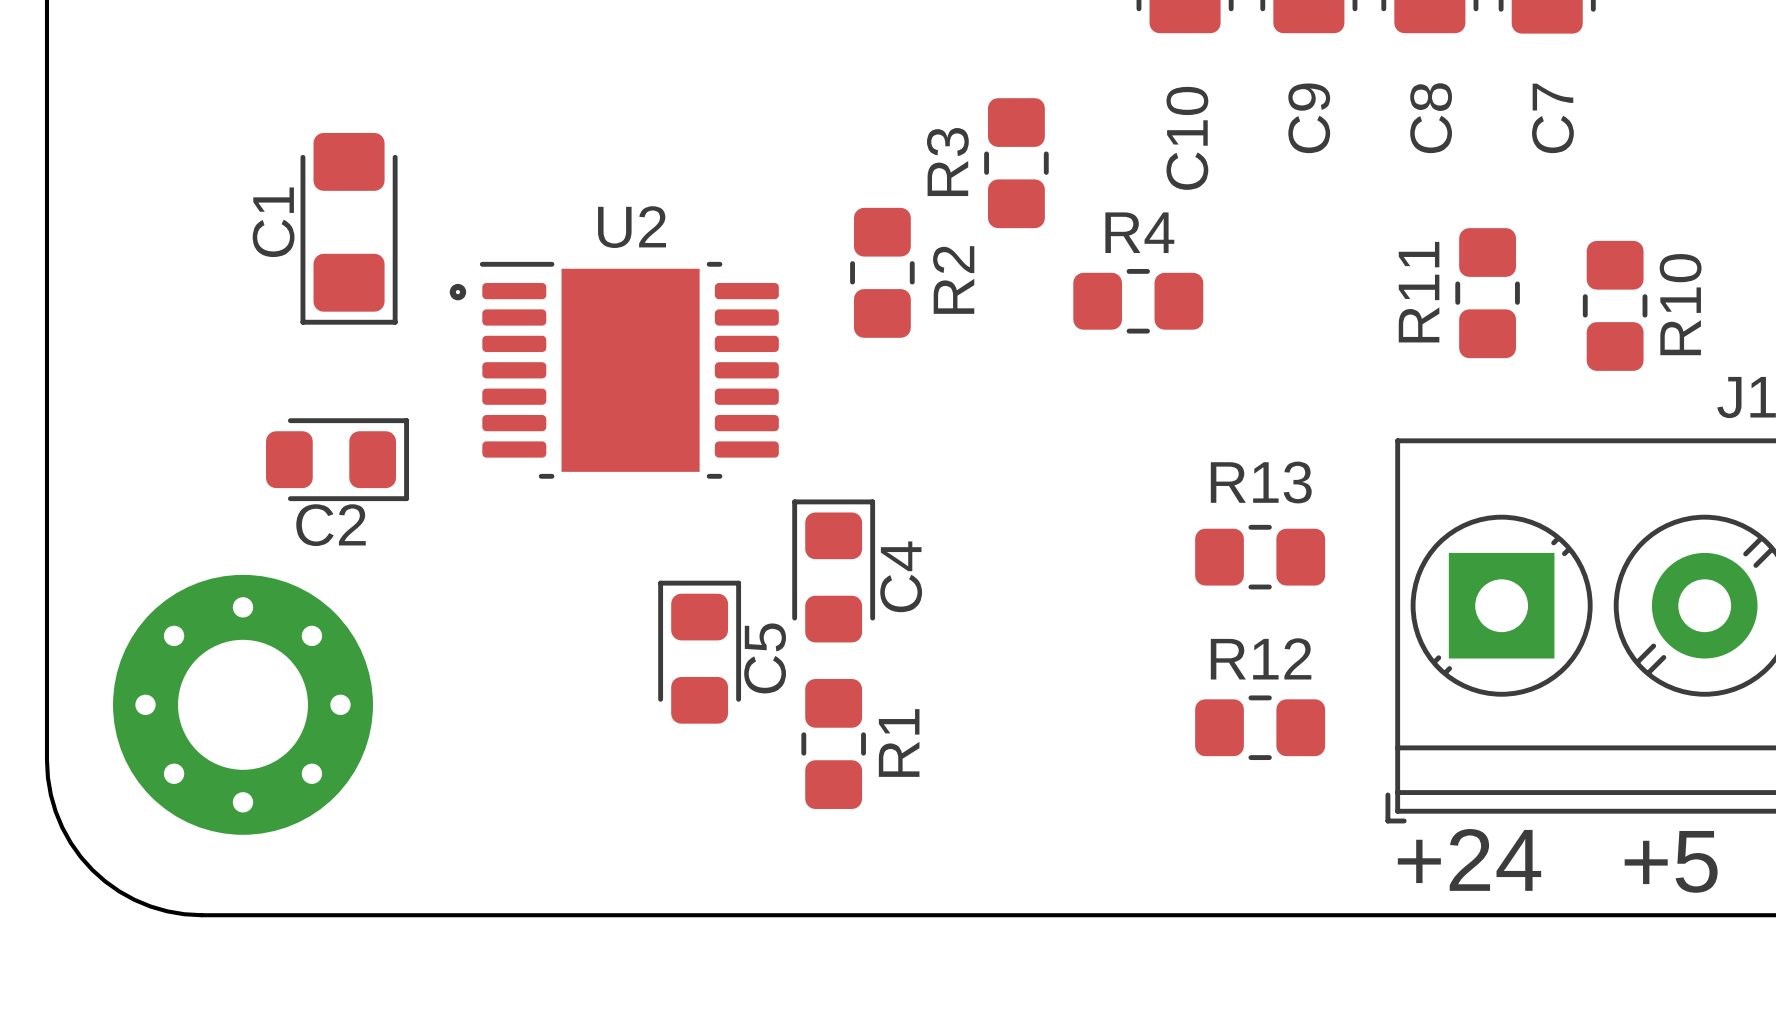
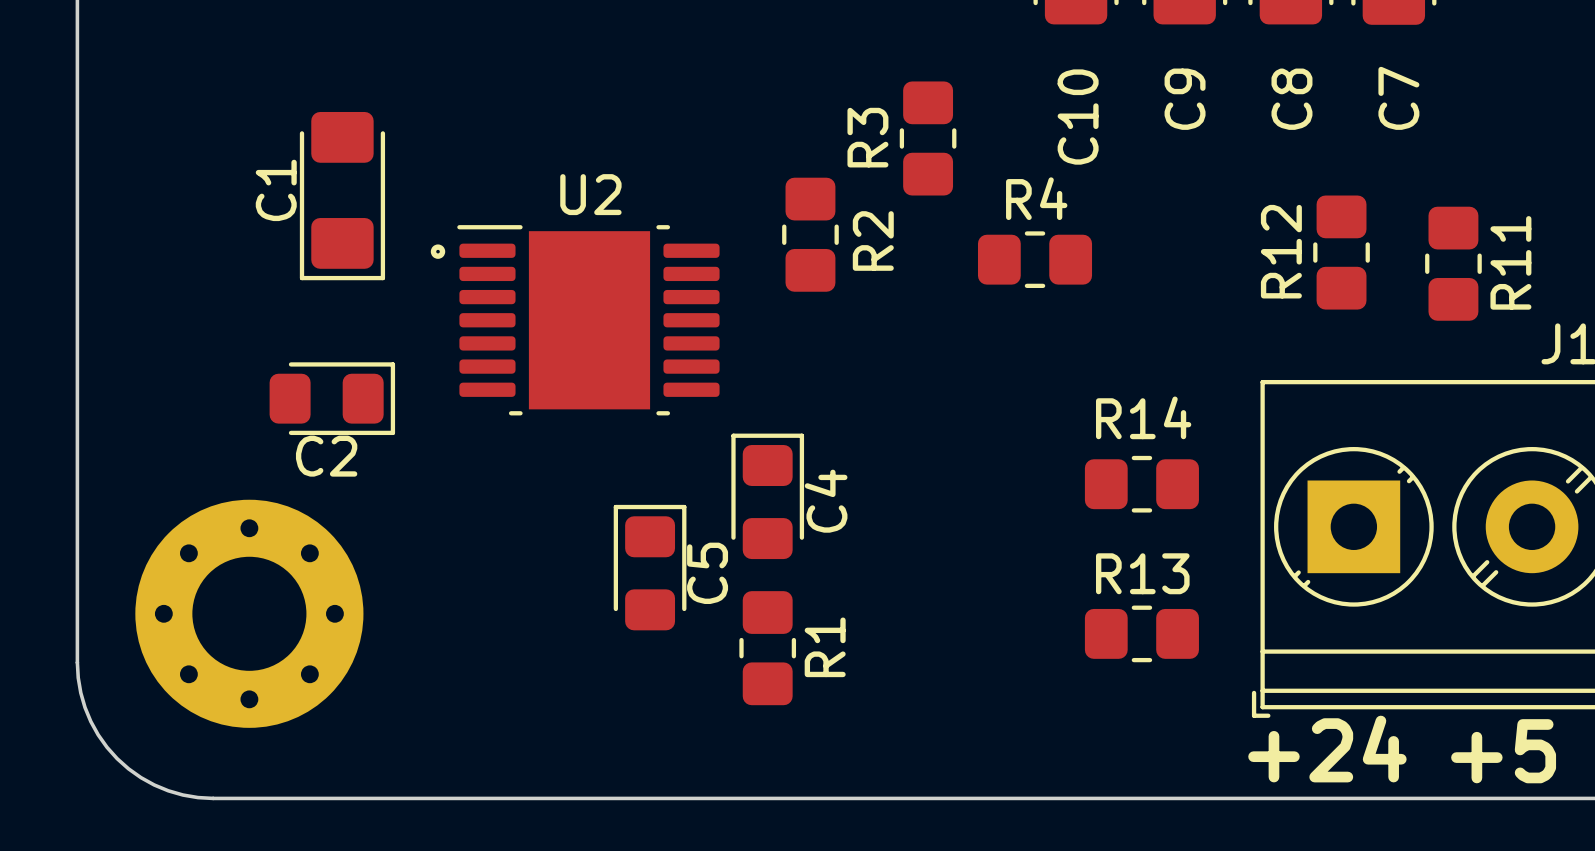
R11 name: R11 (1419, 292) -> R12 (1281, 251)
R10 name: R10 (1680, 304) -> R11 (1510, 262)
R13 name: R13 (1261, 482) -> R14 (1143, 417)
R12 name: R12 (1261, 658) -> R13 (1142, 573)

